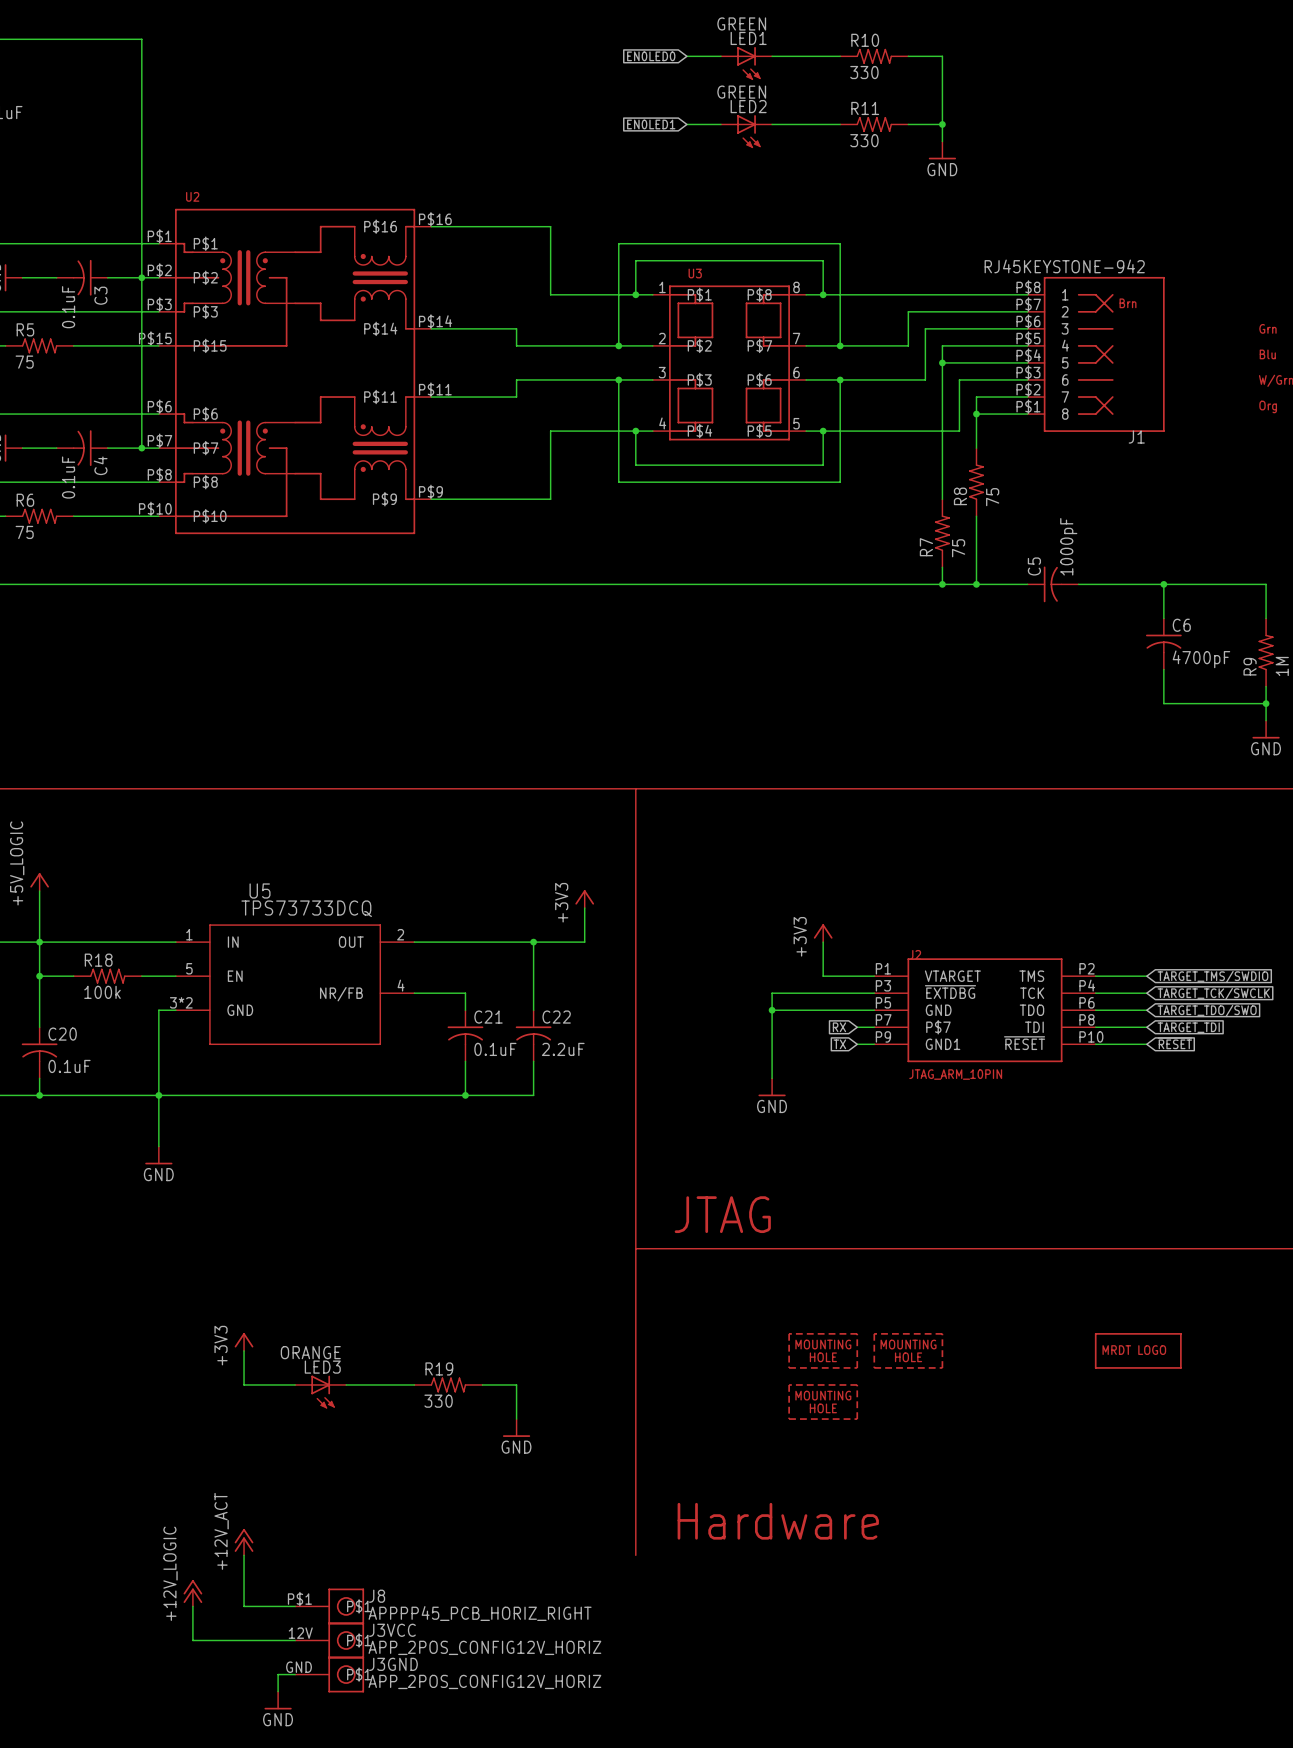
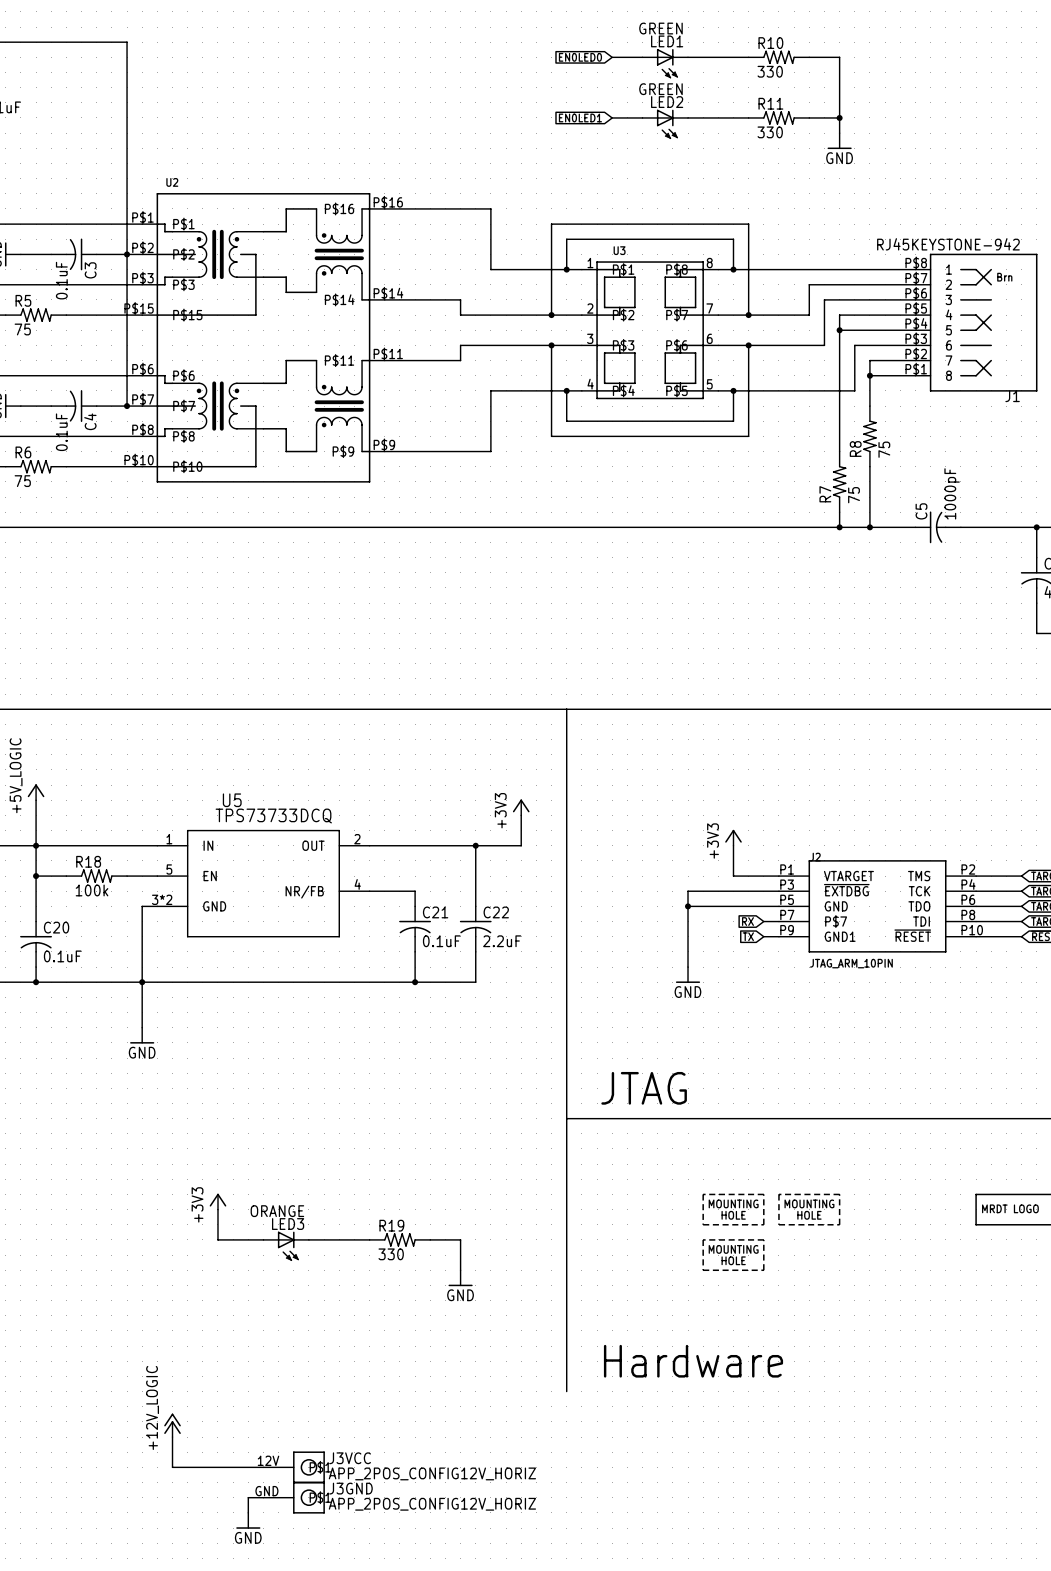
power symbol: +12V_ACT (244, 1542) -> none
wire: (244, 1555) (244, 1606) (295, 1606) -> none
J8: APPPP45_PCB_HORIZ_RIGHT (329, 1606) -> none

